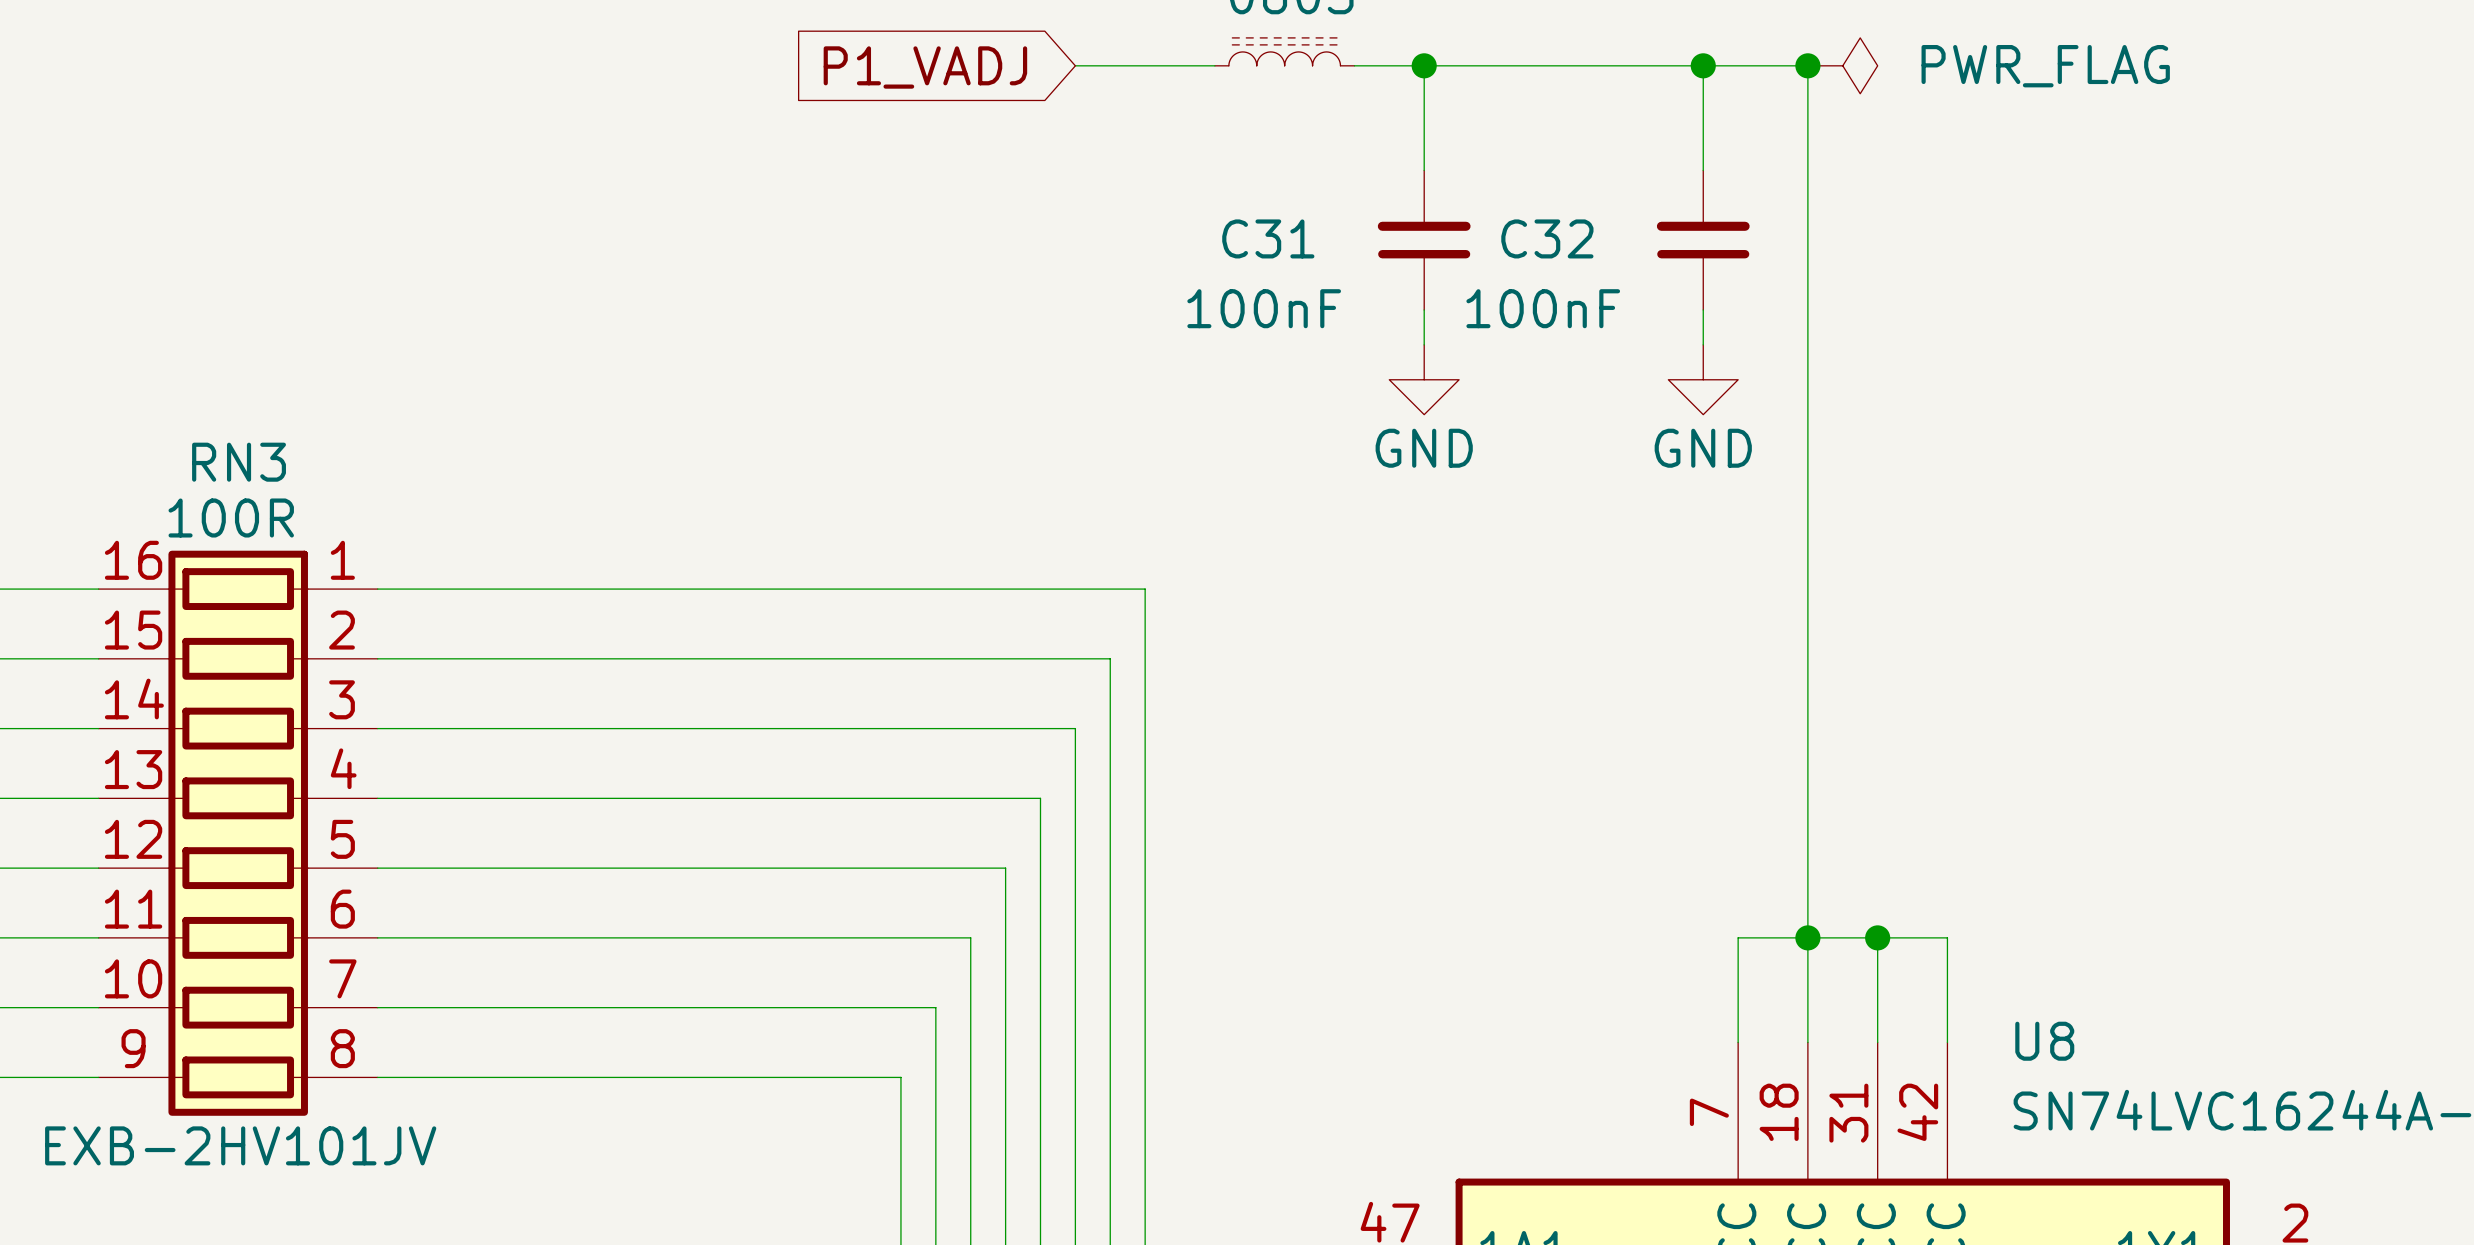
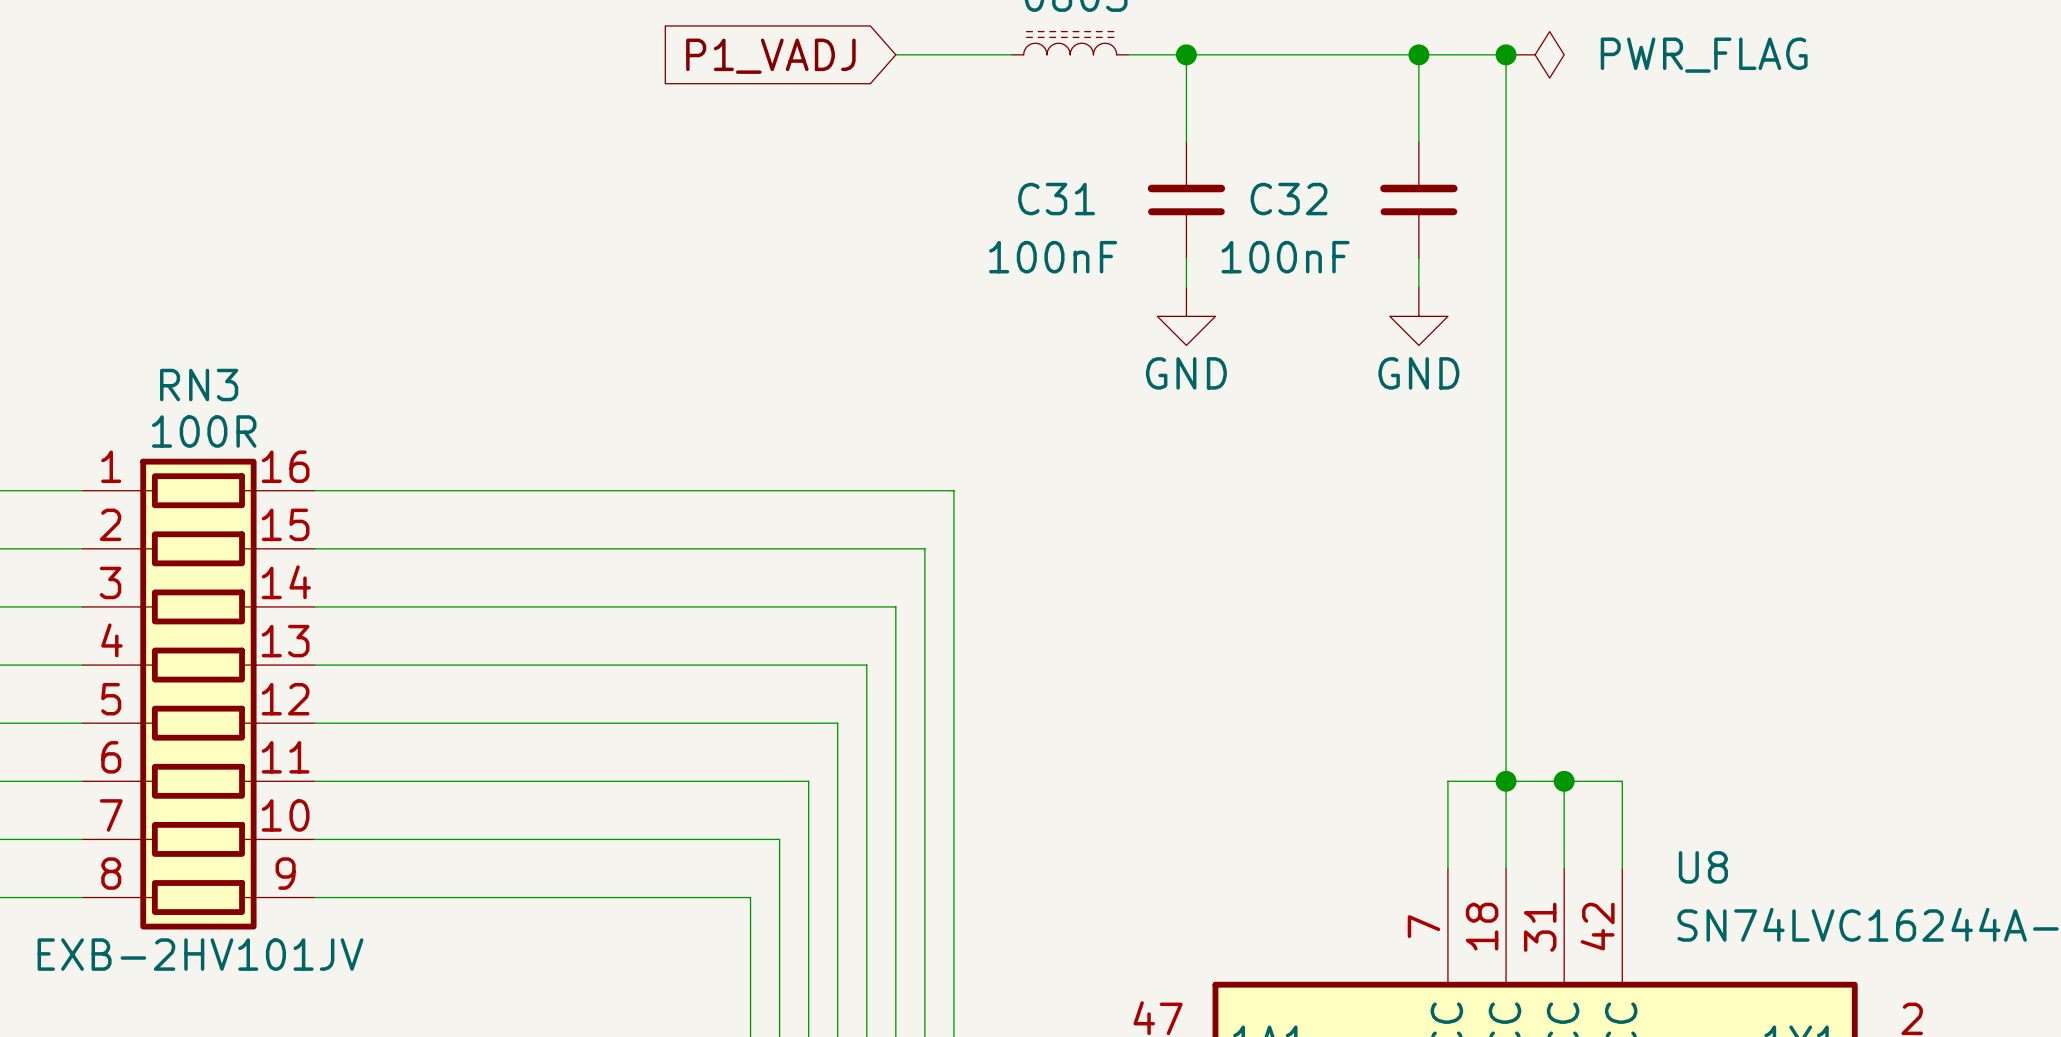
RN3 flip: as is (238, 833) -> left-right (198, 694)

